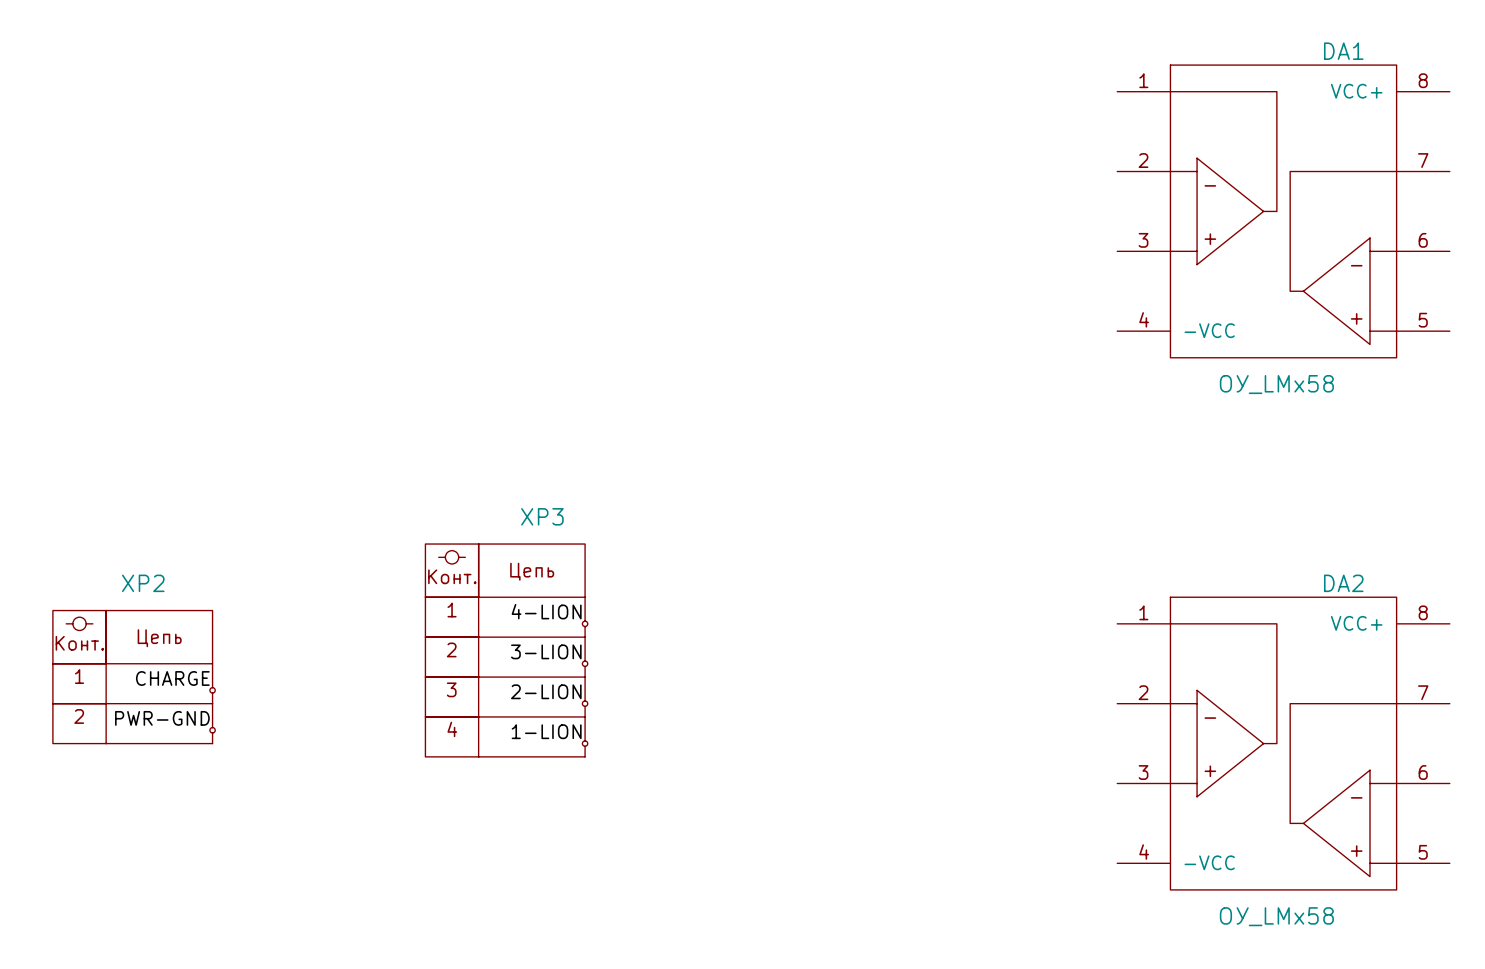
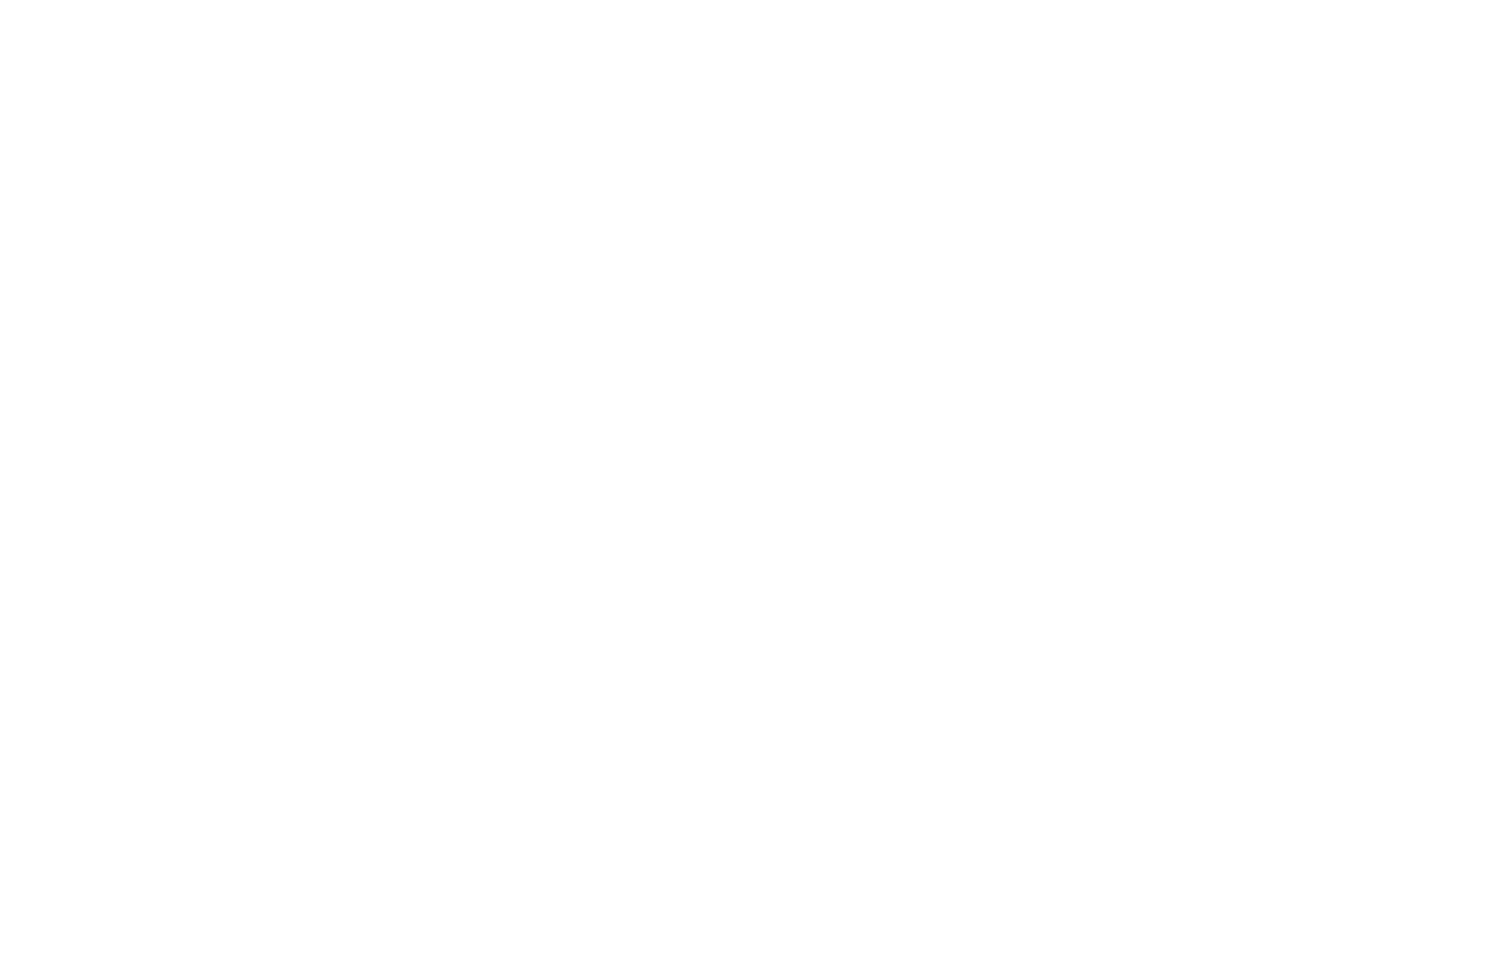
DA1: ОУ_LMx58 (1283, 211) -> none
label: 4-LION (546, 611) -> none
XP3: (506, 650) -> none
label: 3-LION (546, 651) -> none
XP2: (134, 677) -> none
label: CHARGE (172, 678) -> none
label: 2-LION (546, 691) -> none
label: PWR-GND (162, 718) -> none
label: 1-LION (546, 731) -> none
DA2: ОУ_LMx58 (1283, 743) -> none

